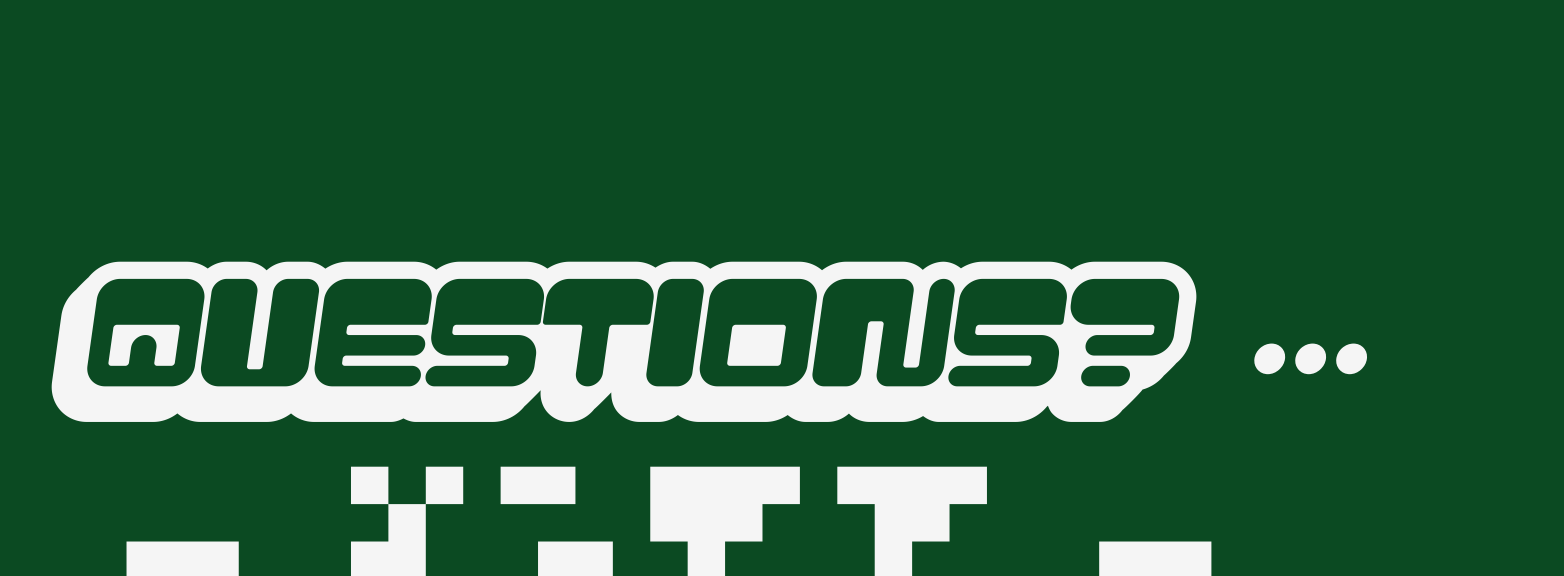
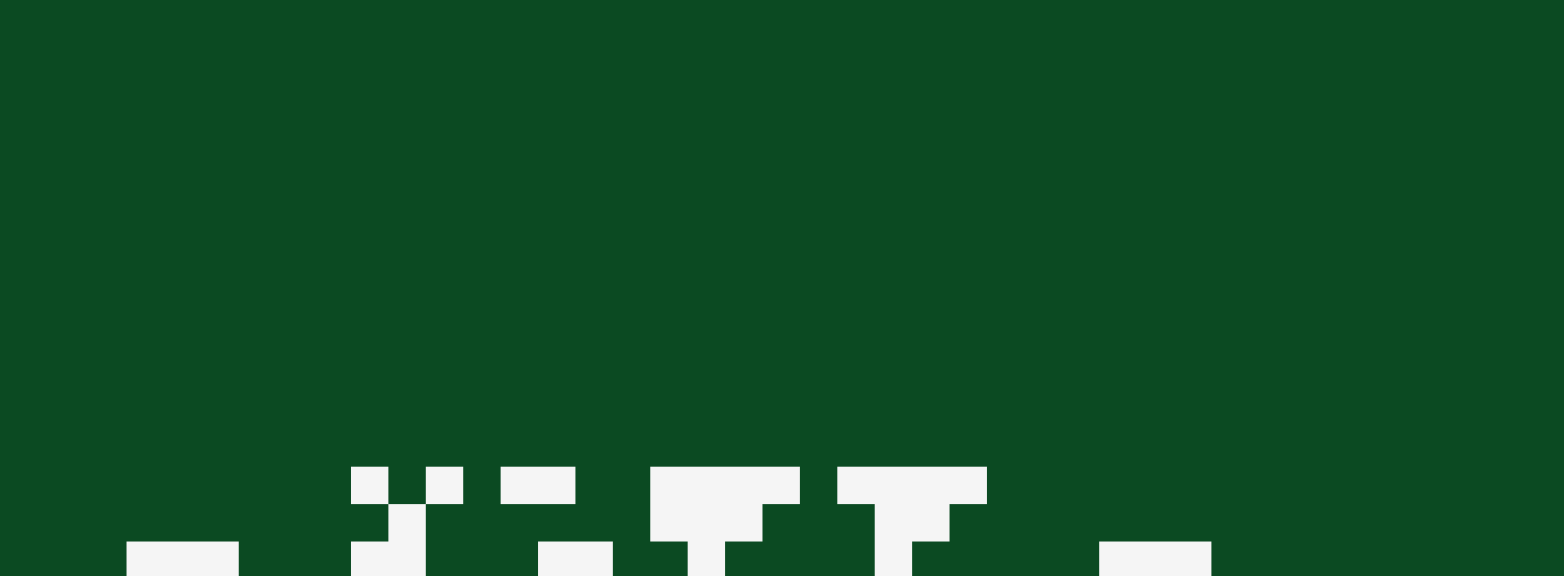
drawing: [51, 261, 1197, 422] -> none
text: ••• (1310, 358) -> none

